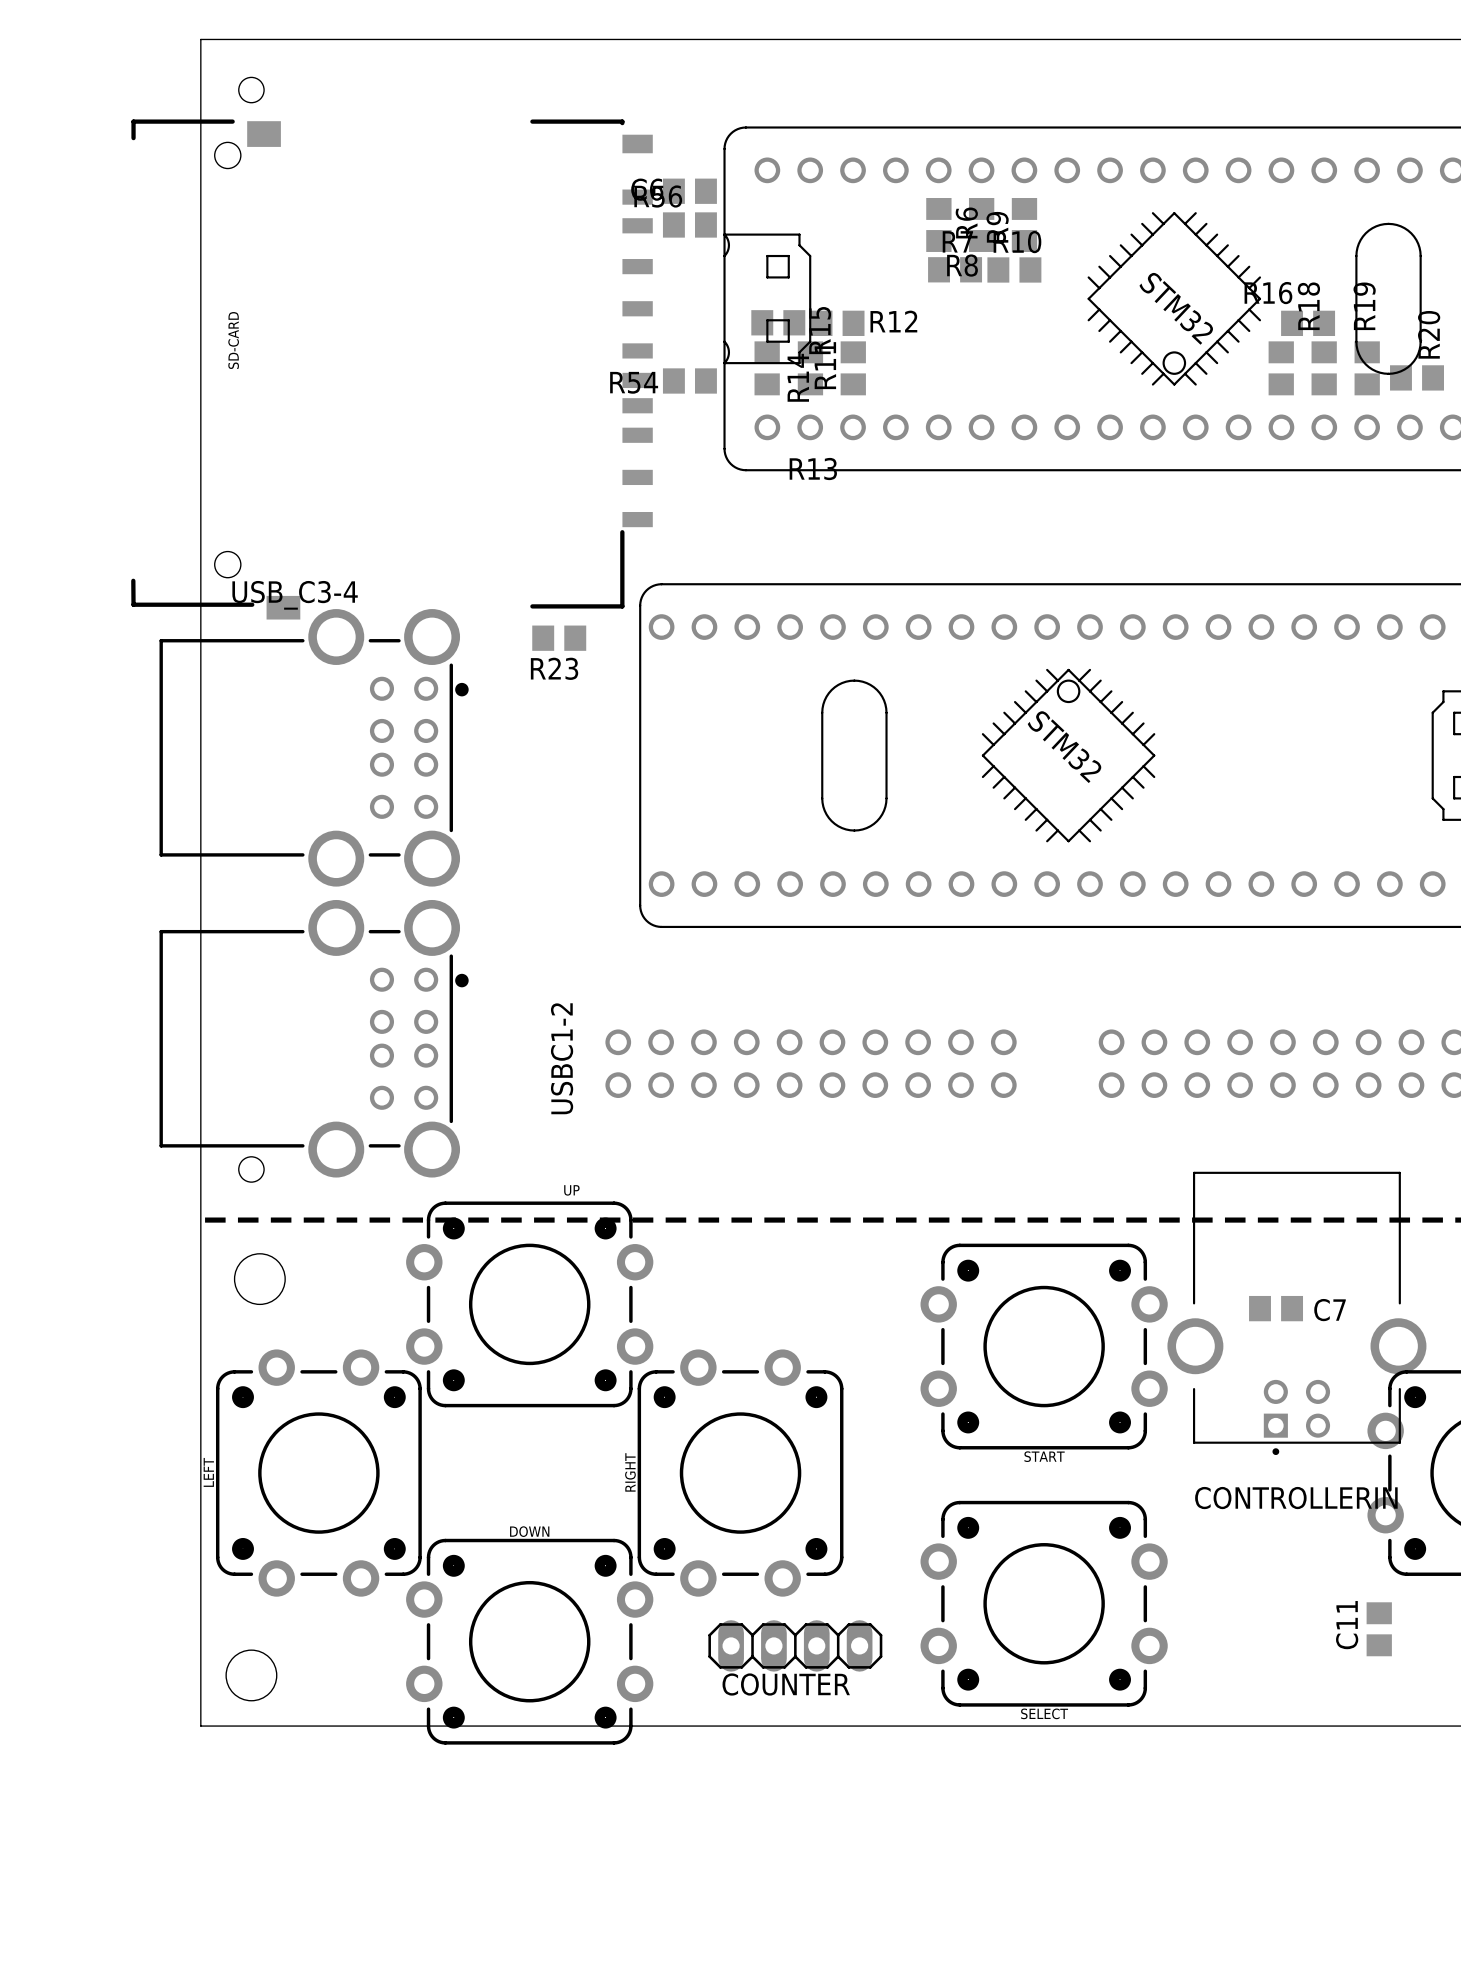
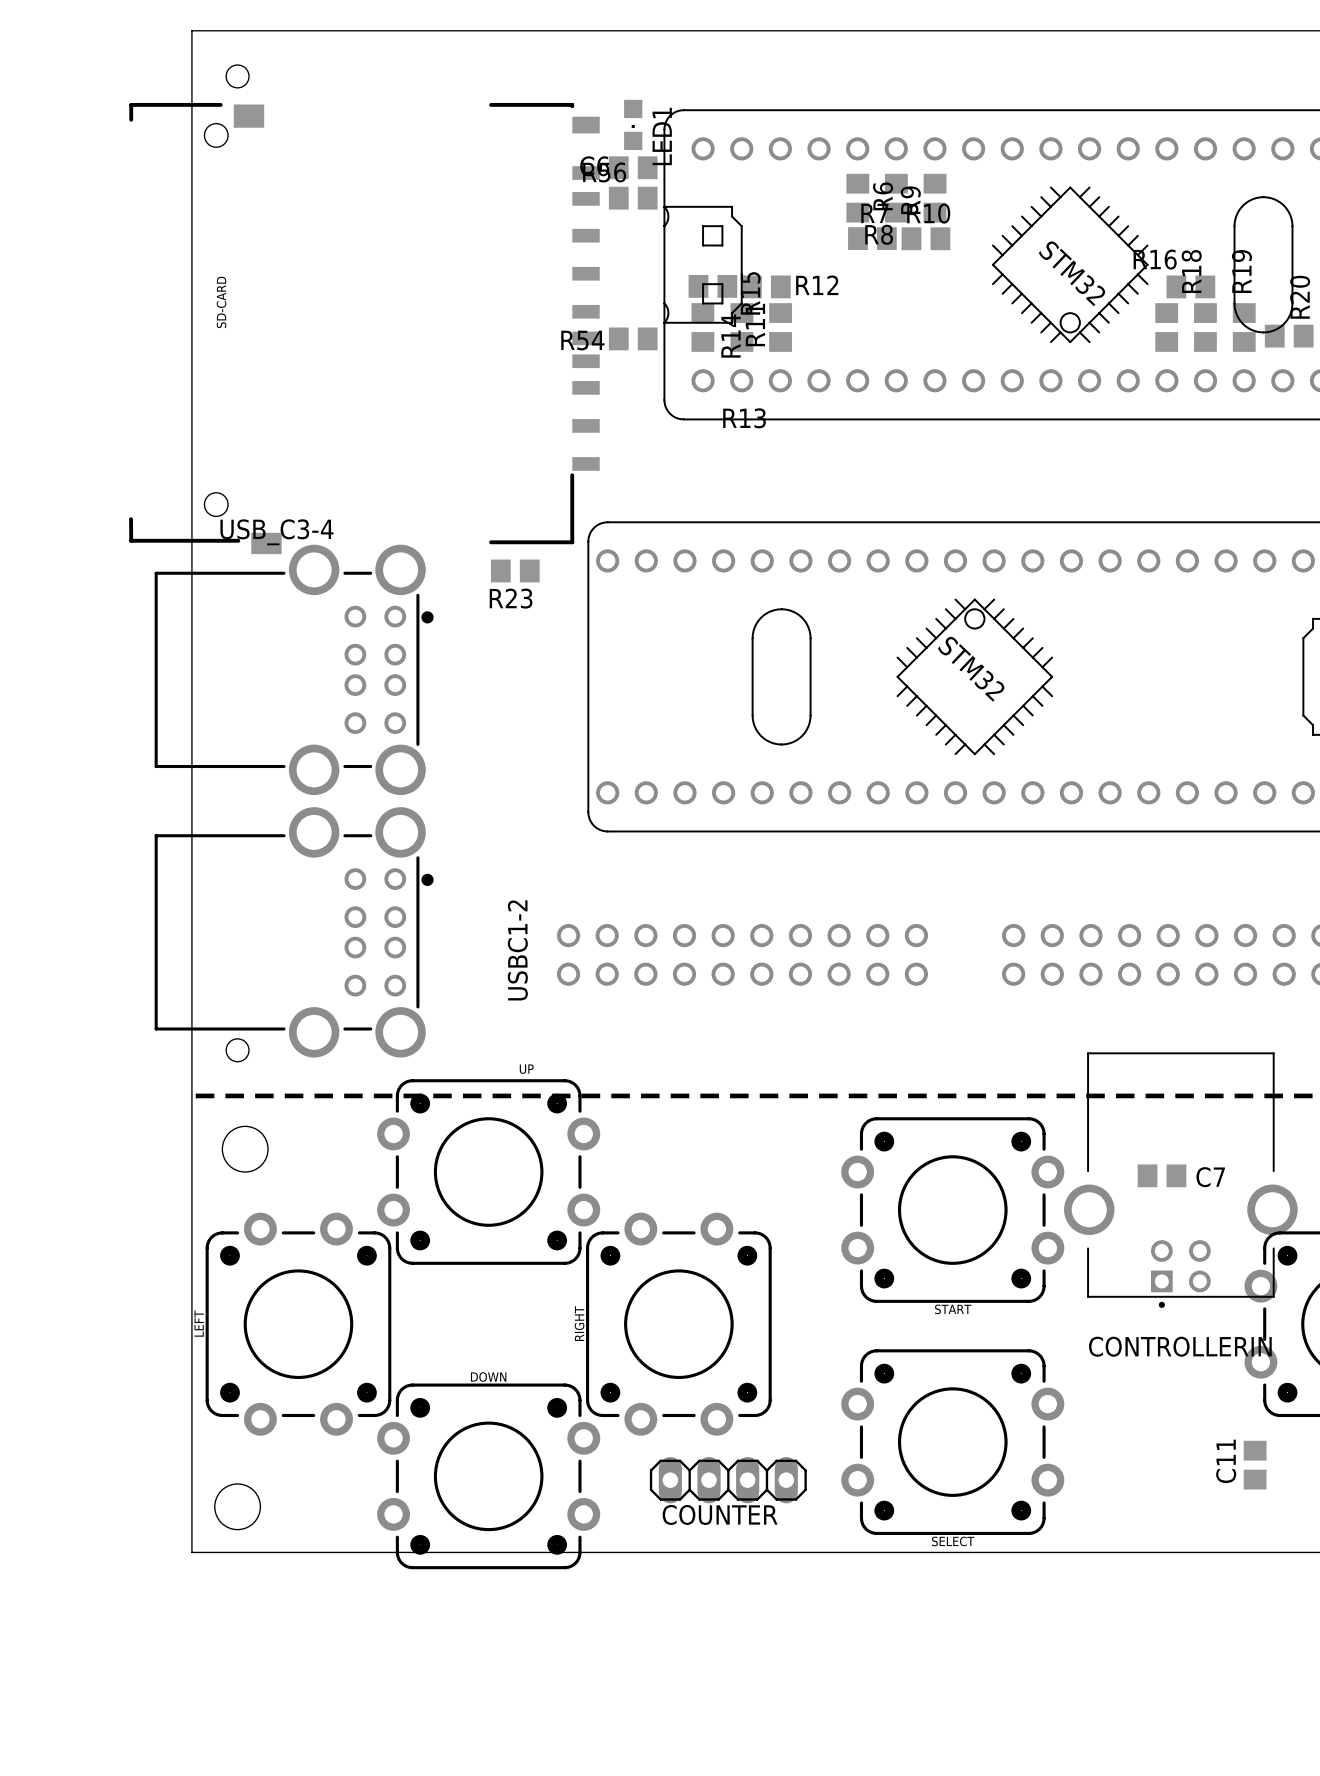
LED1: none -> (633, 124)

